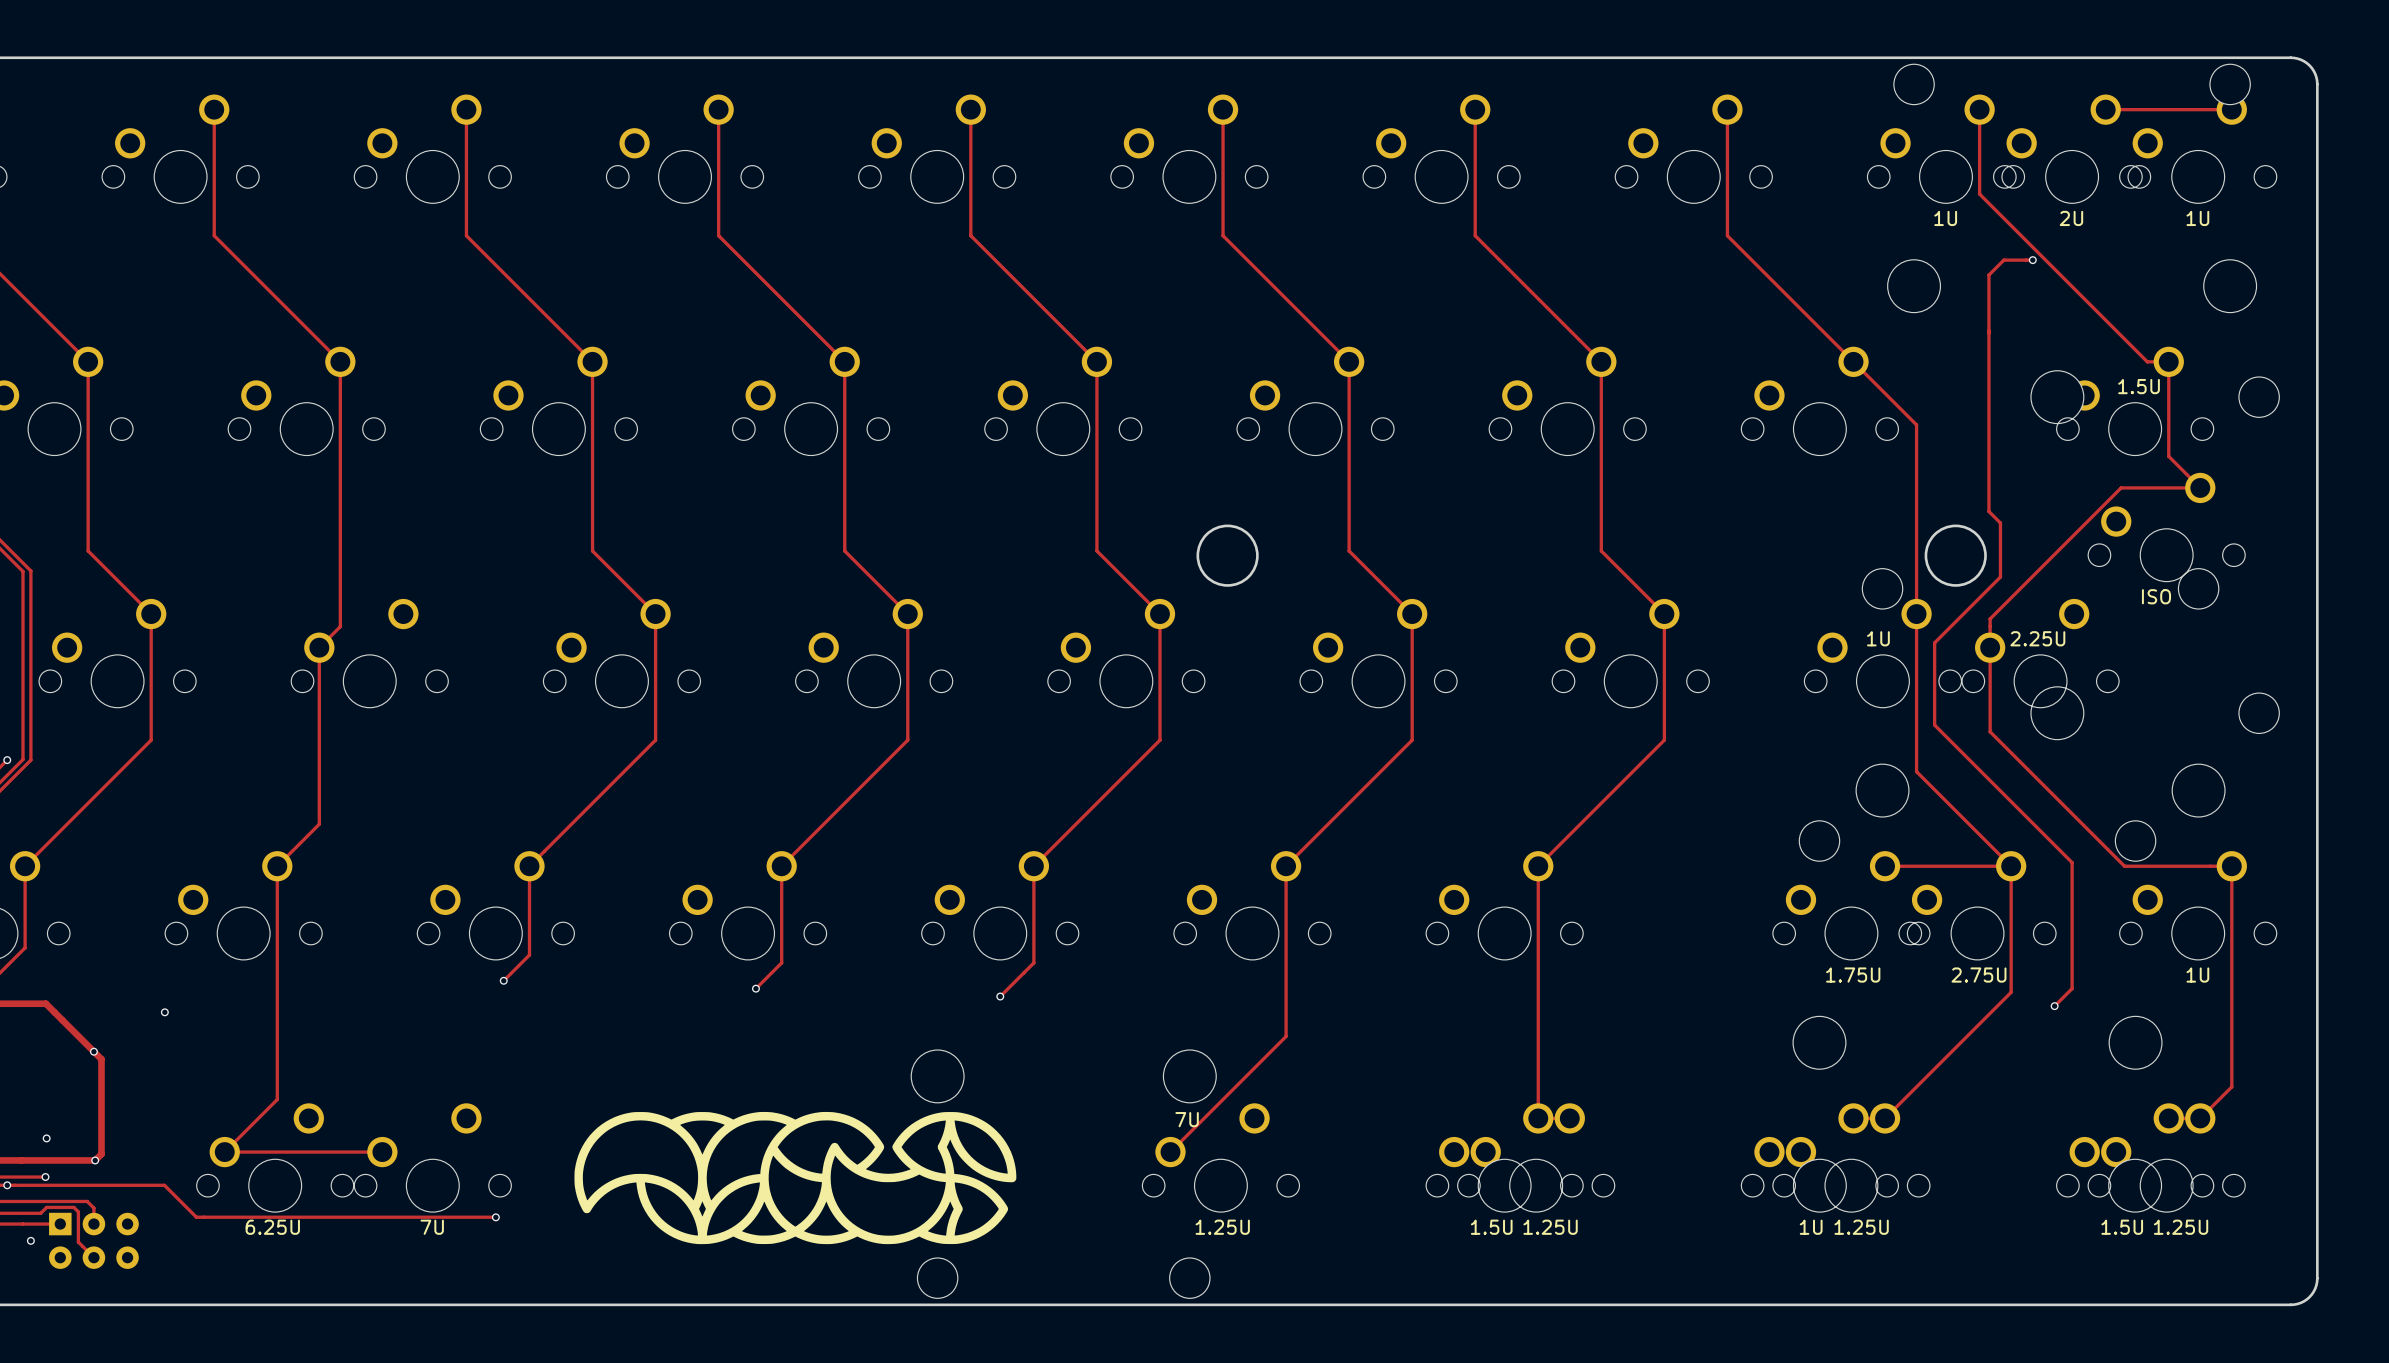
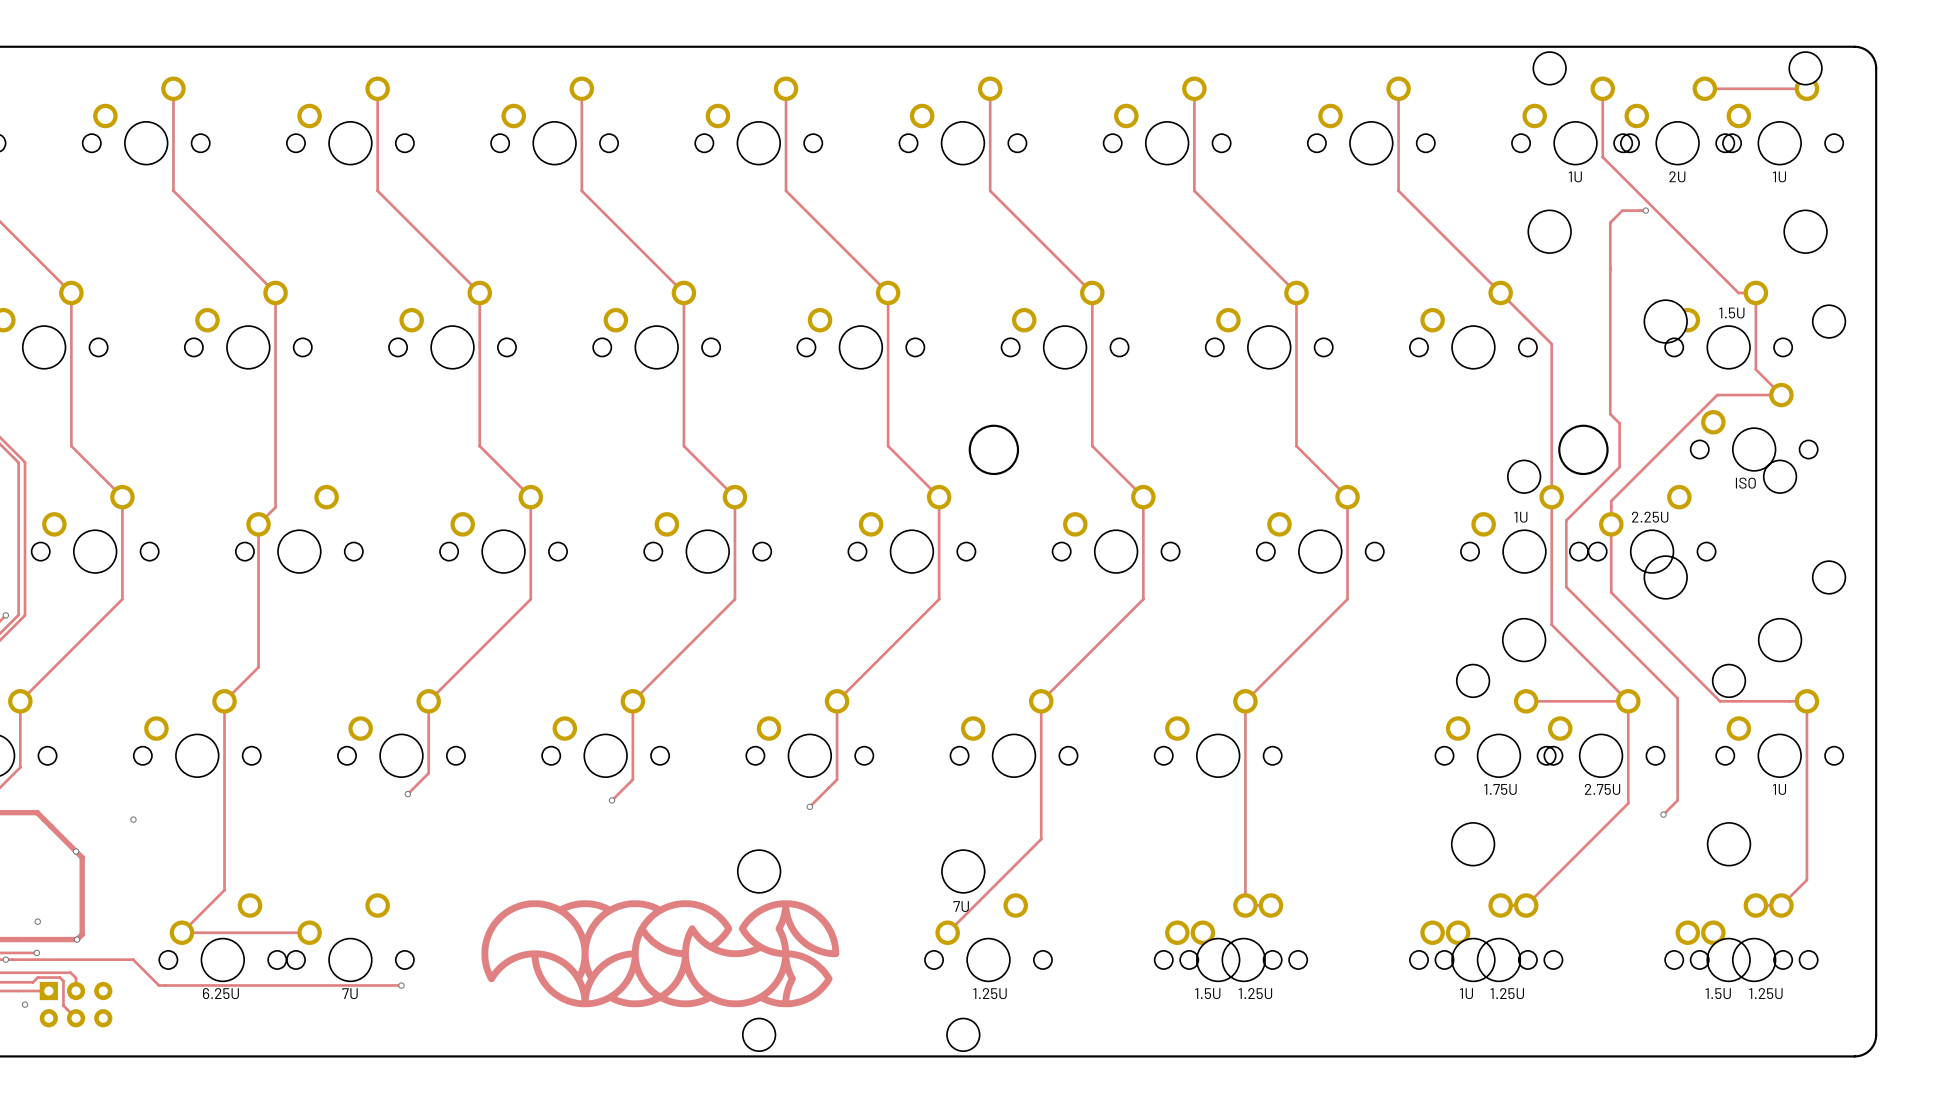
drawing: [574, 1111, 1017, 1245] -> none
drawing: none -> [481, 900, 840, 1008]

